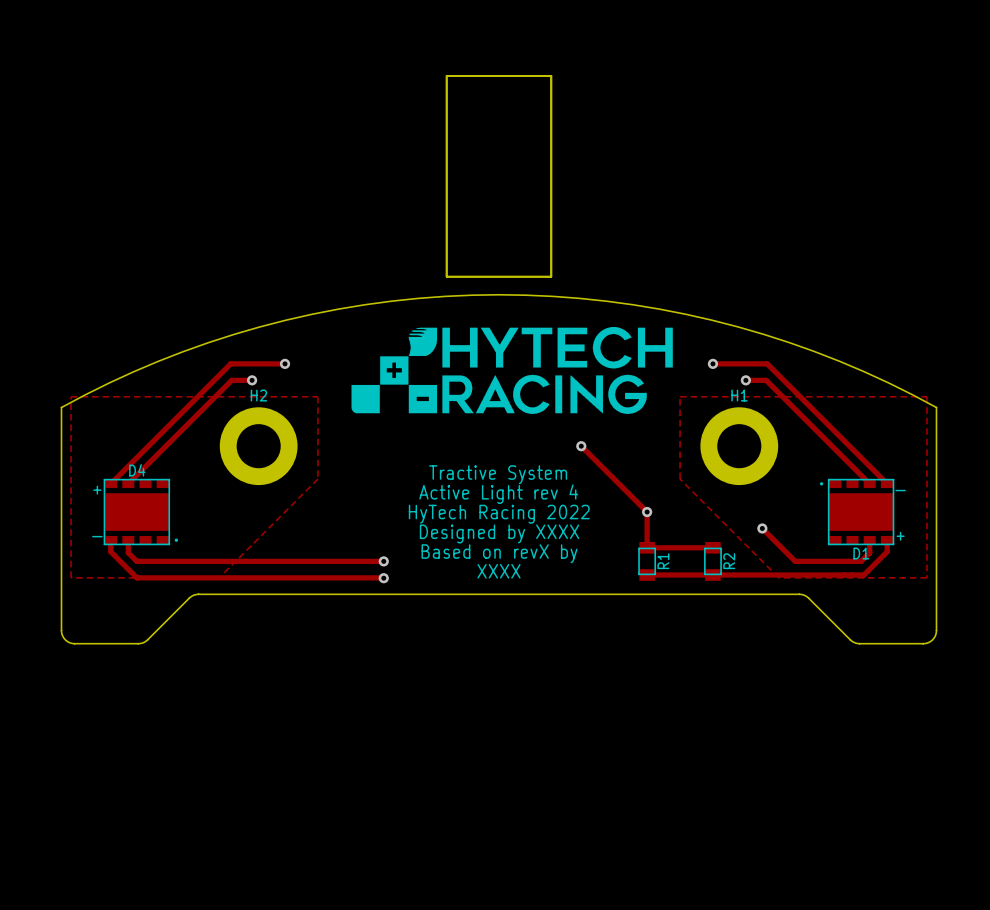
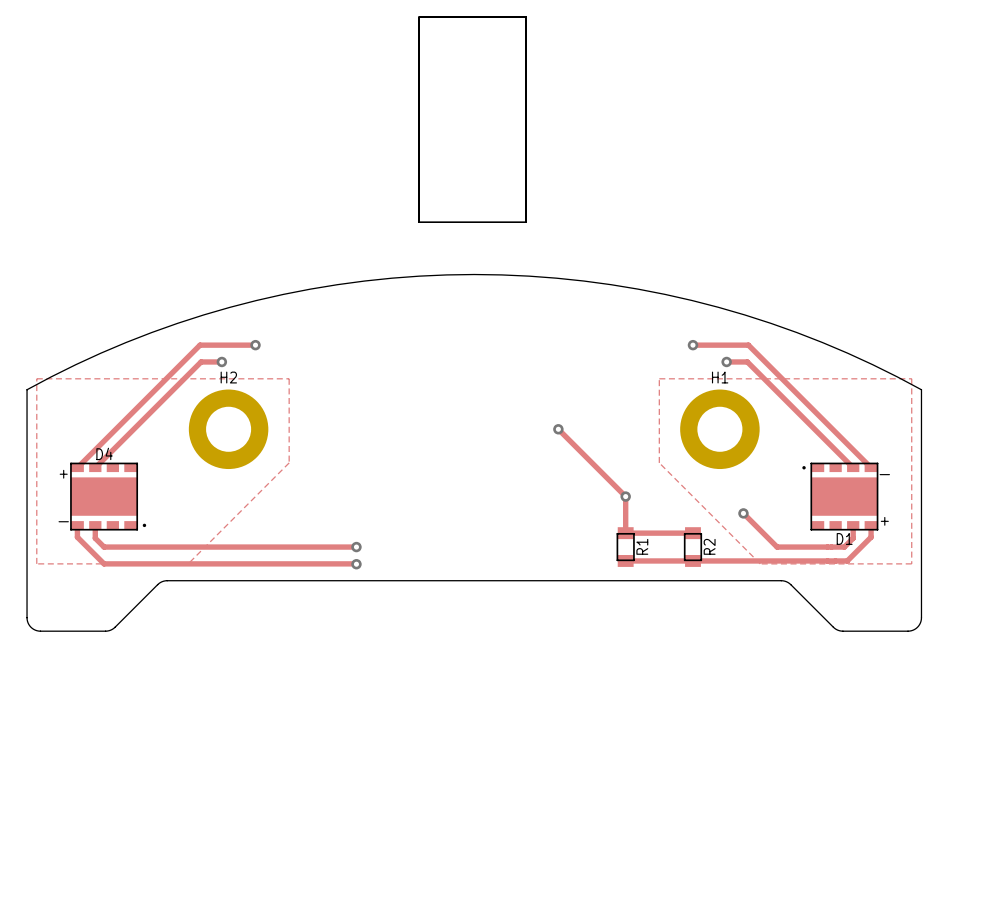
part position: (498, 176) -> (472, 119)
drawing: [351, 327, 673, 414] -> none
text: Tractive System (498, 474) -> none
text: Active Light rev 4 (498, 494) -> none
text: HyTech Racing 2022 (499, 514) -> none
text: Designed by XXXX (499, 533) -> none
text: Based on revX by (499, 553) -> none
text: XXXX (498, 571) -> none

